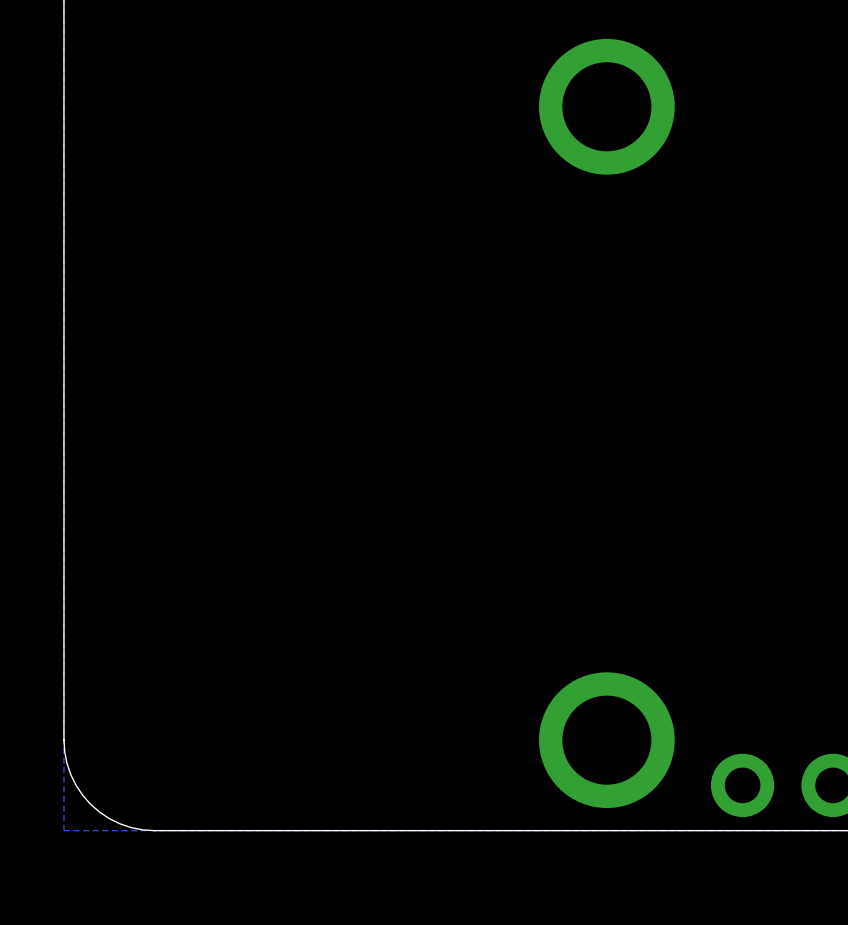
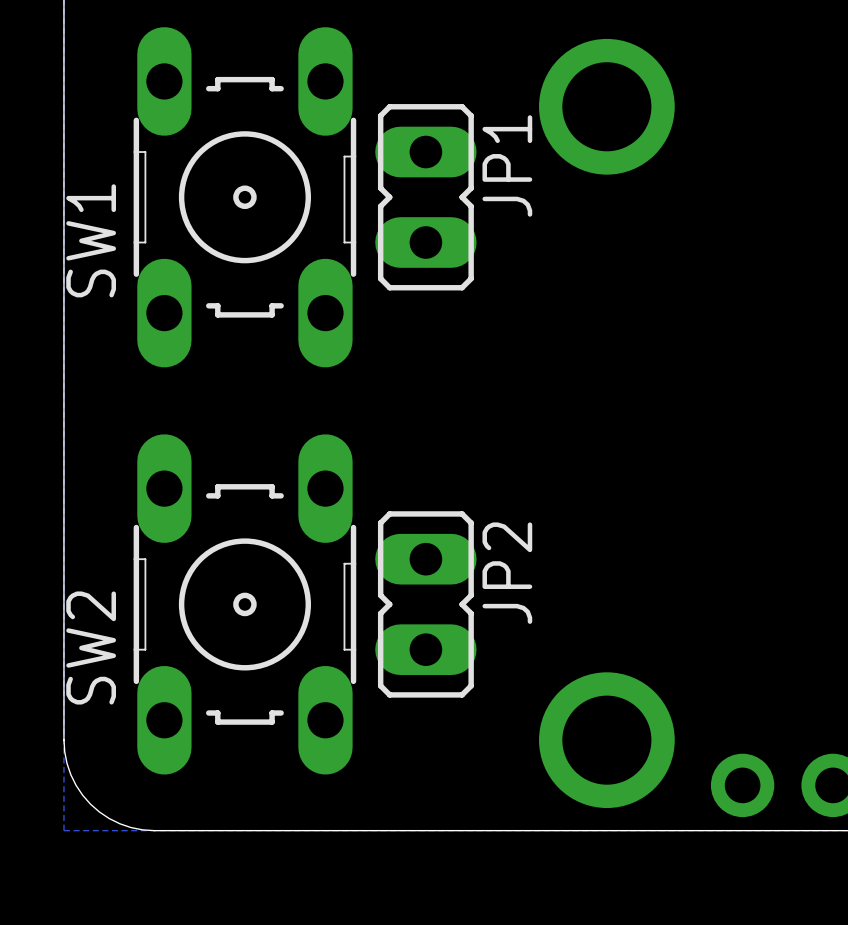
SW1: none -> (244, 197)
JP1: none -> (425, 197)
SW2: none -> (244, 604)
JP2: none -> (425, 604)

